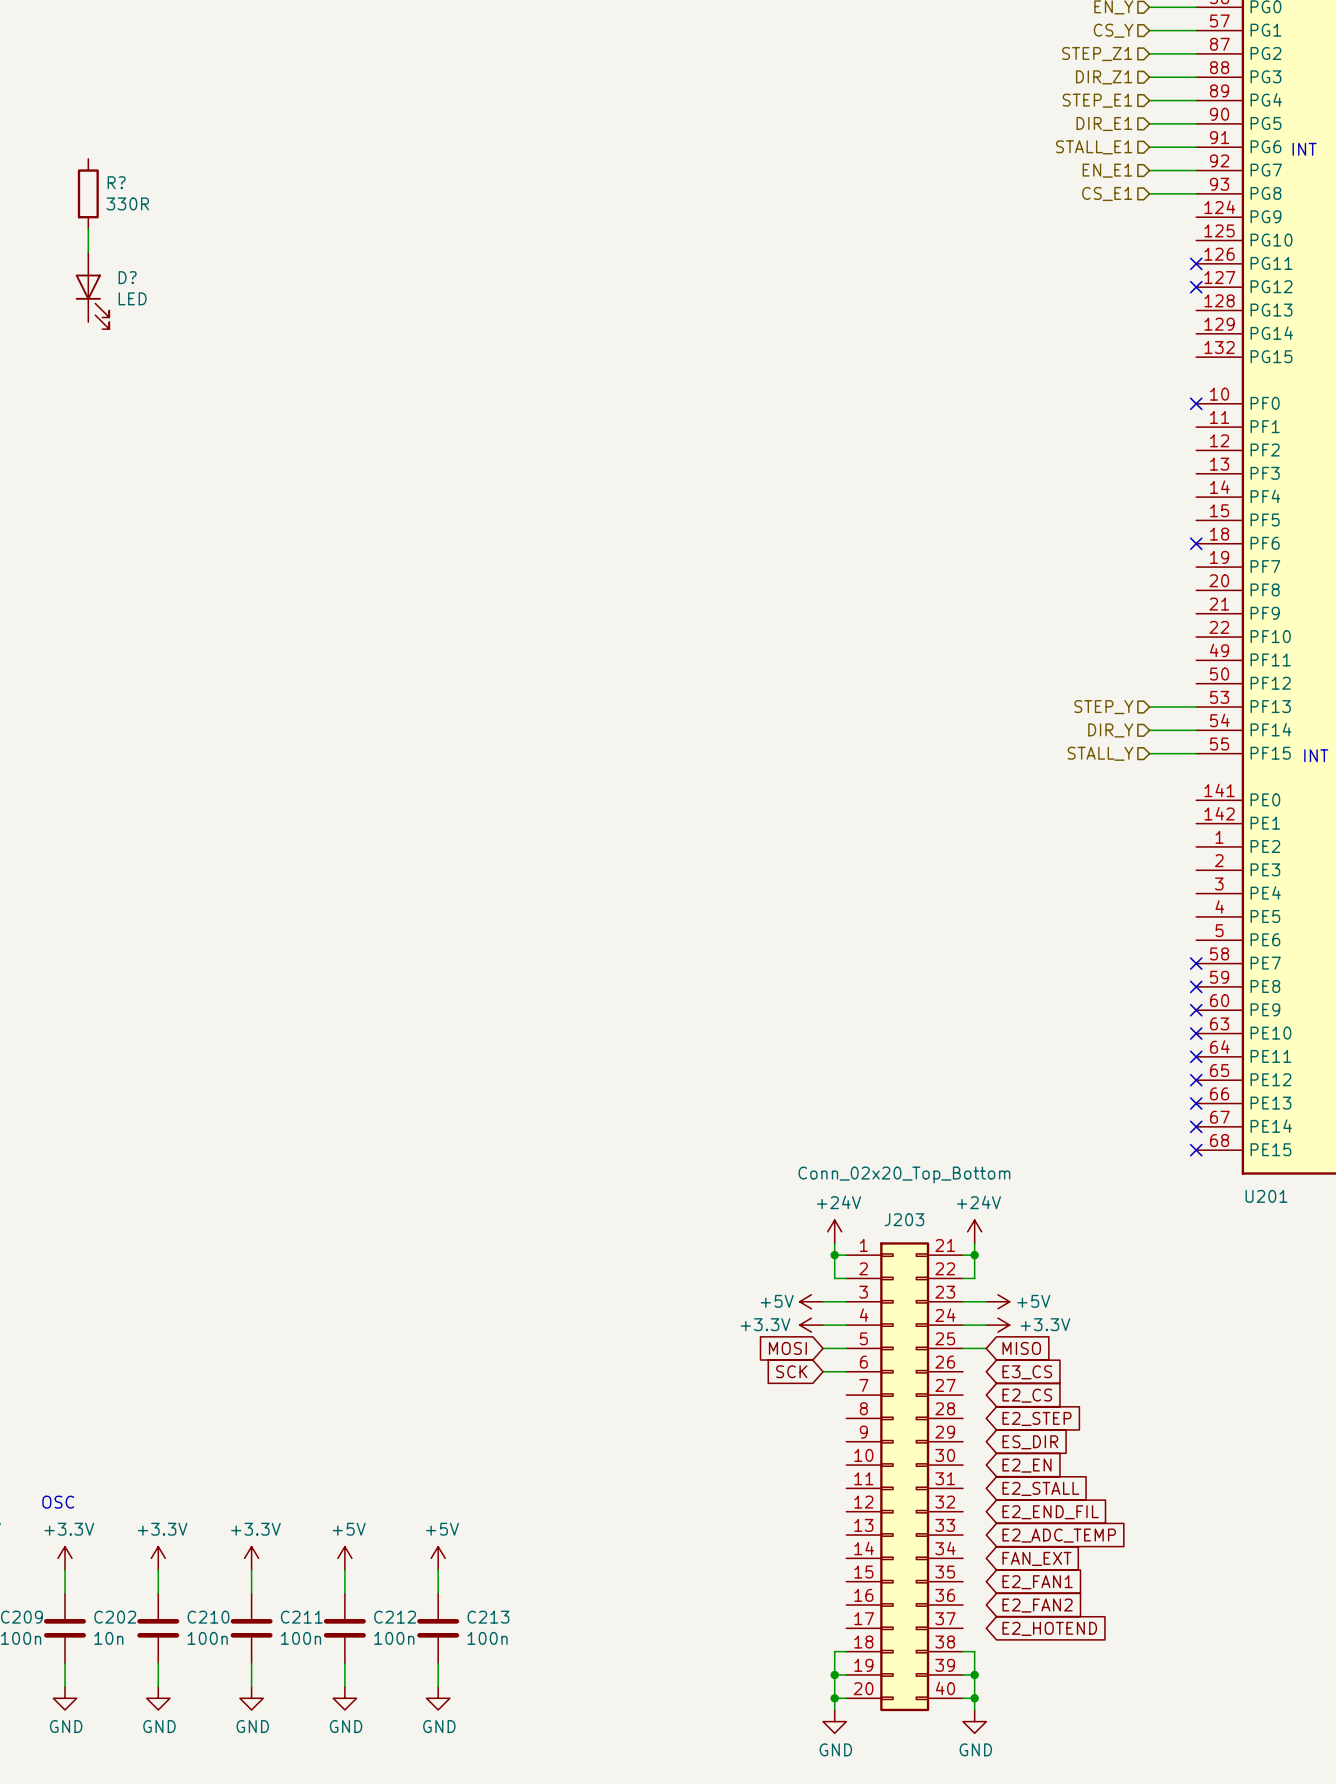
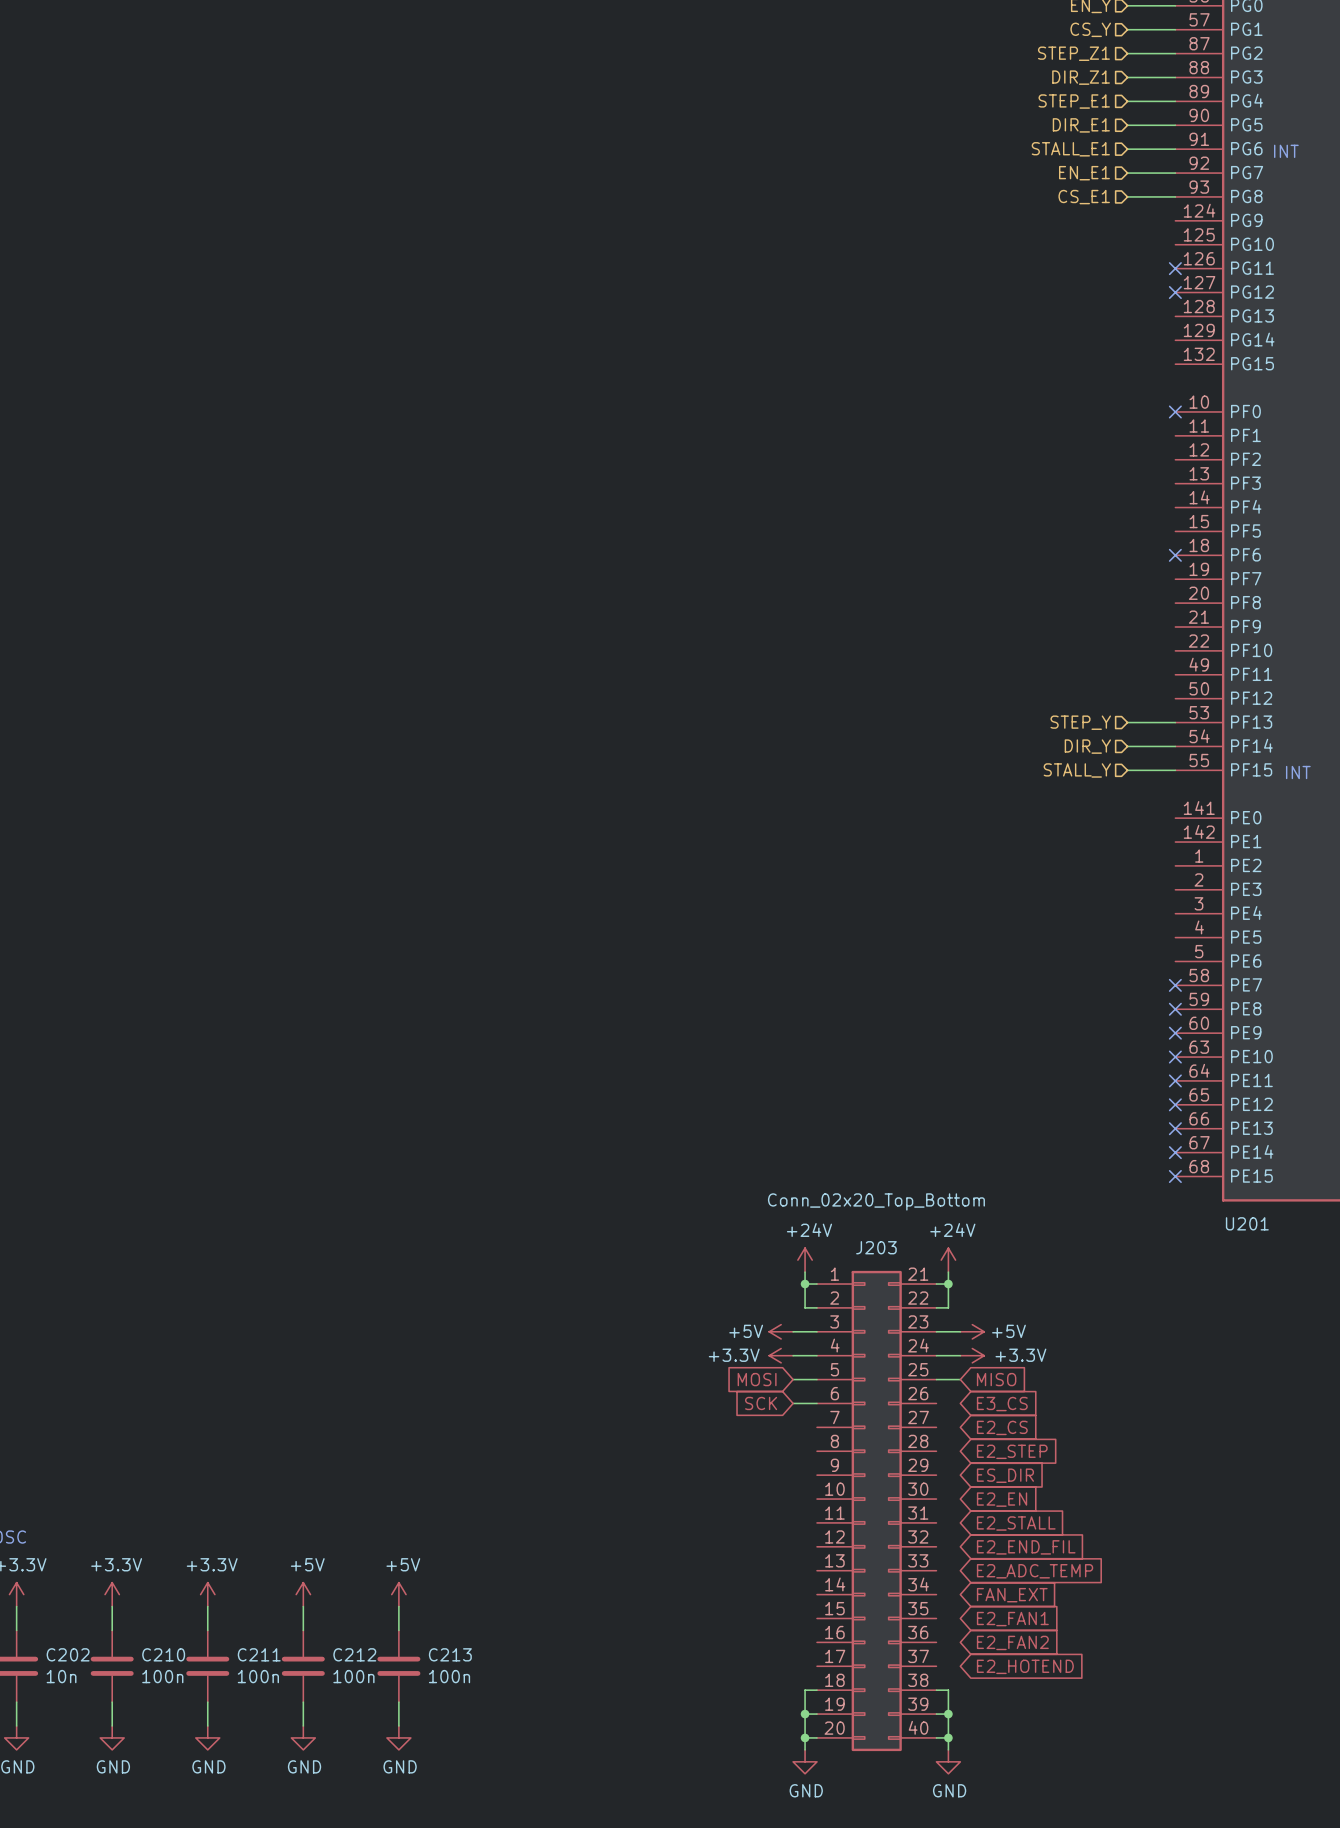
R?: 330R (88, 193) -> none
wire: (88, 228) (88, 252) -> none
D?: LED (92, 290) -> none

